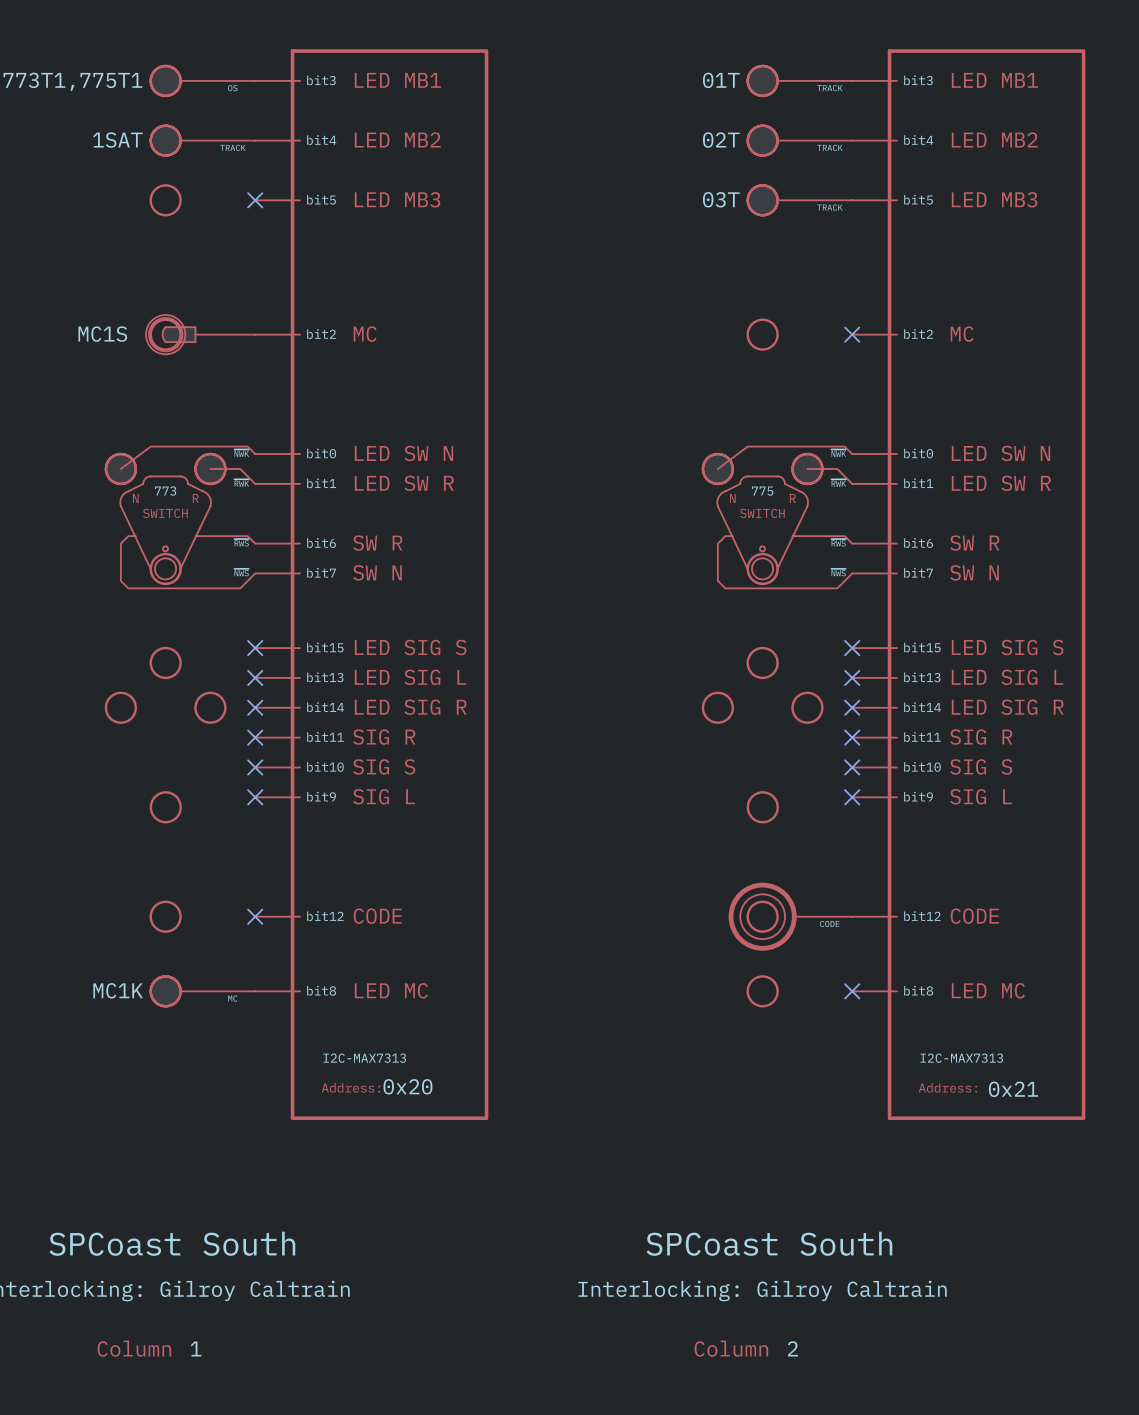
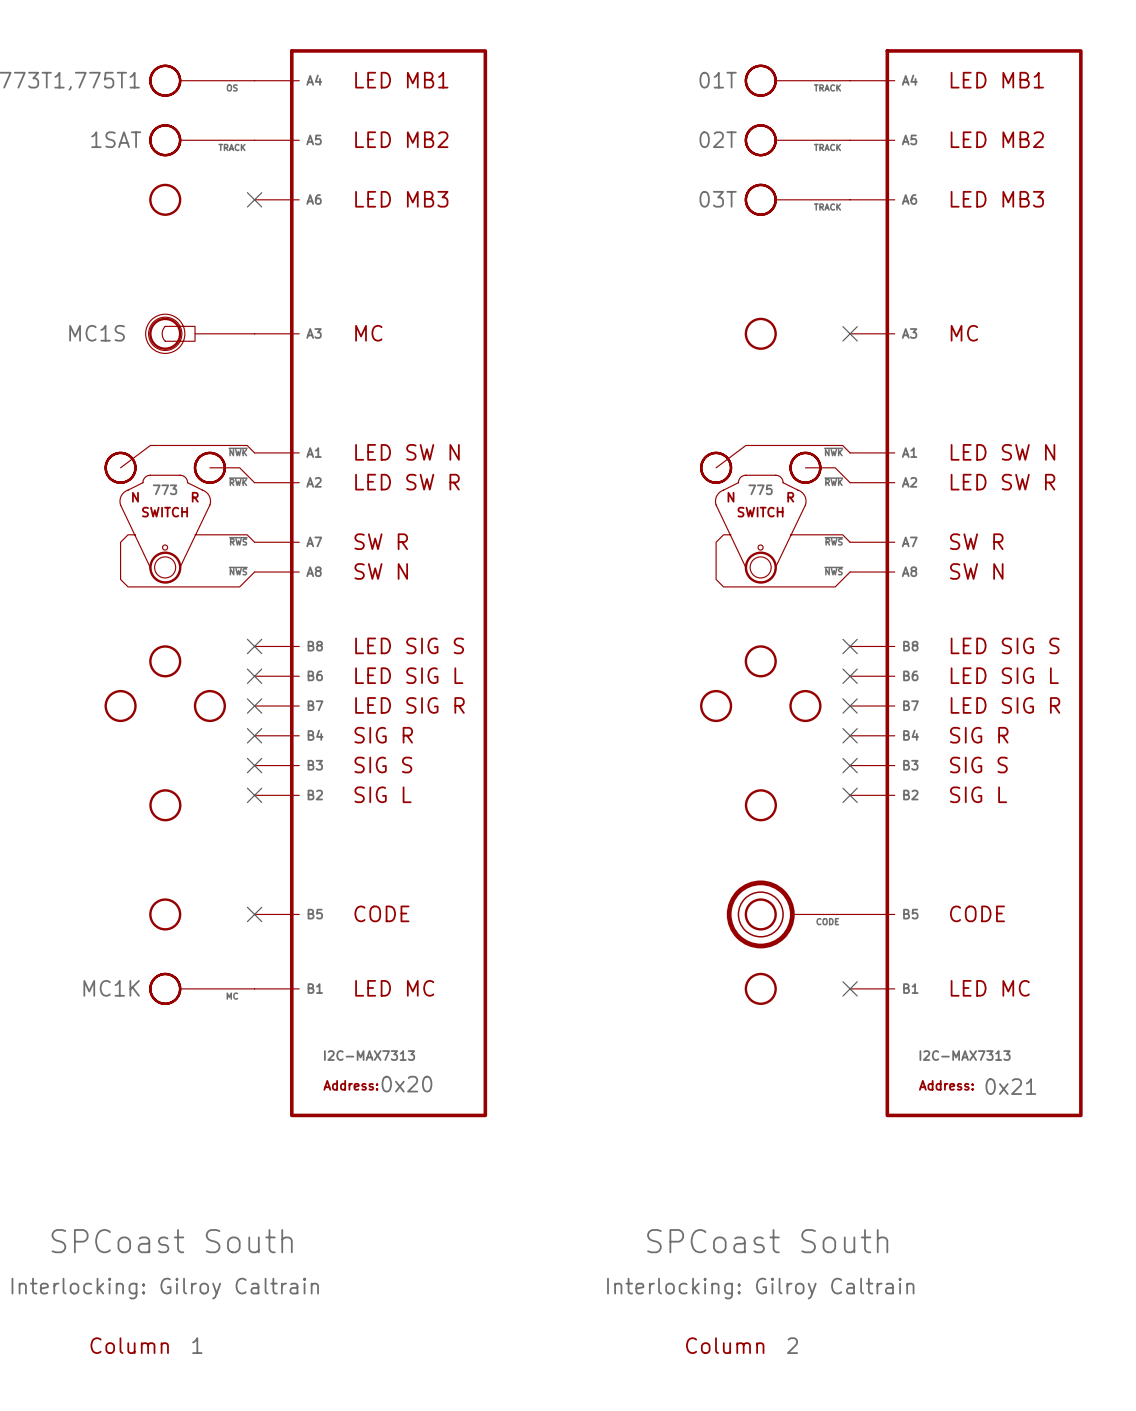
part symbol: [255, 49, 489, 1121] -> [254, 49, 488, 1118]
part symbol: [852, 49, 1086, 1121] -> [850, 49, 1083, 1118]

